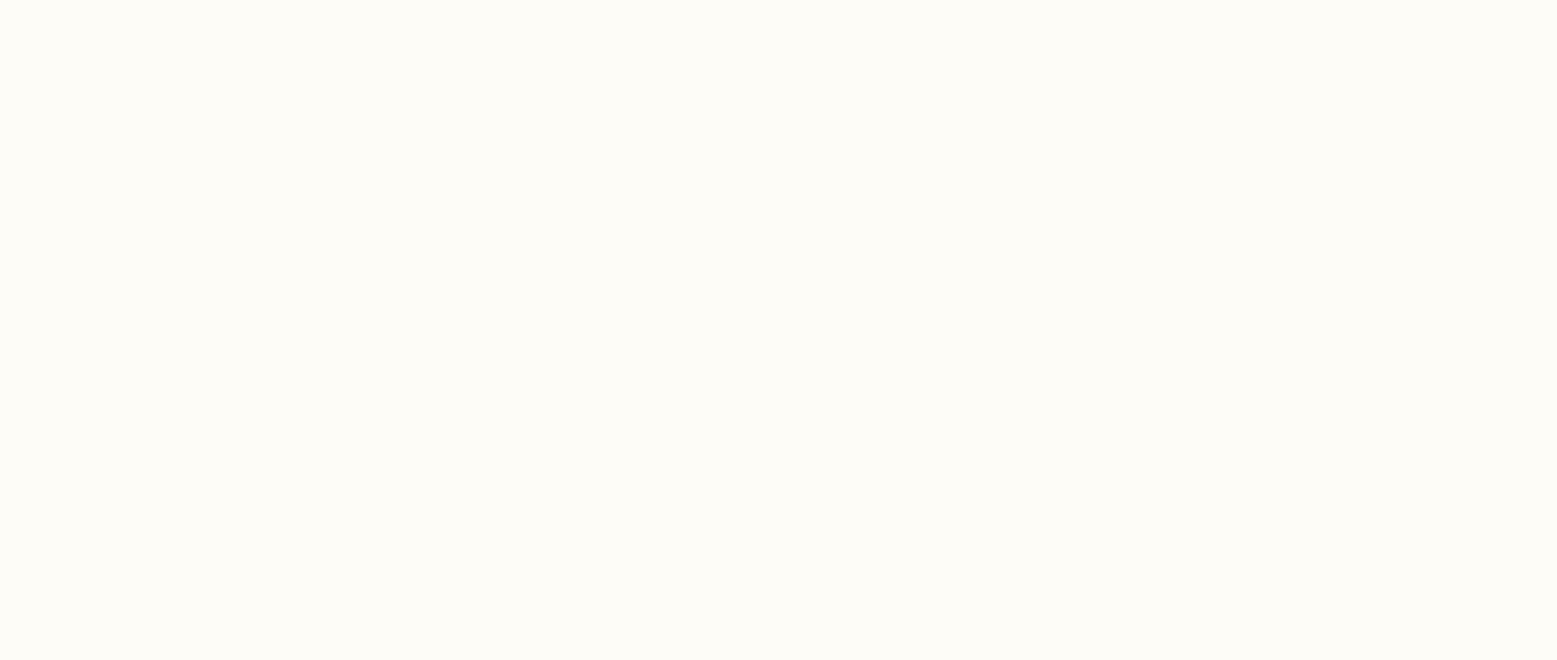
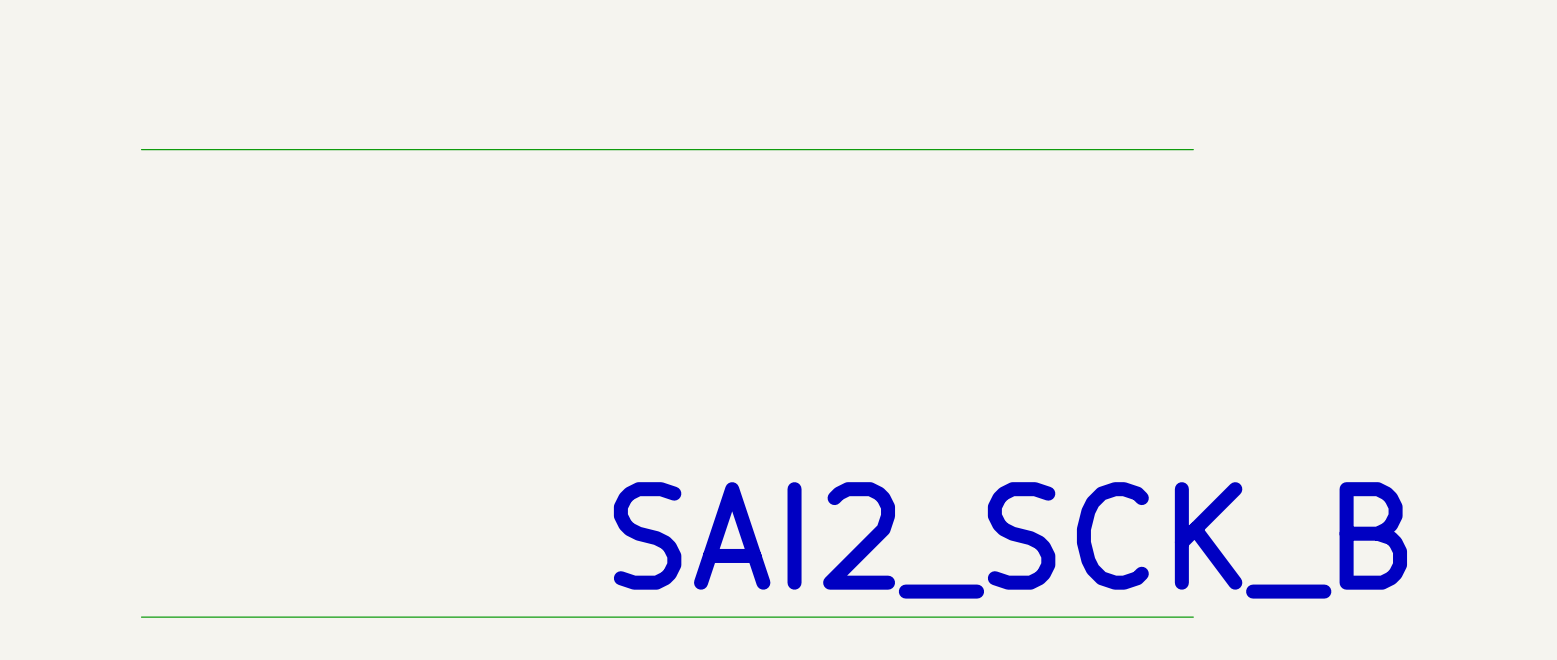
wire: none -> (141, 149) (1193, 149)
text: none -> SAI2_SCK_B (1010, 540)
wire: none -> (141, 617) (1193, 617)

